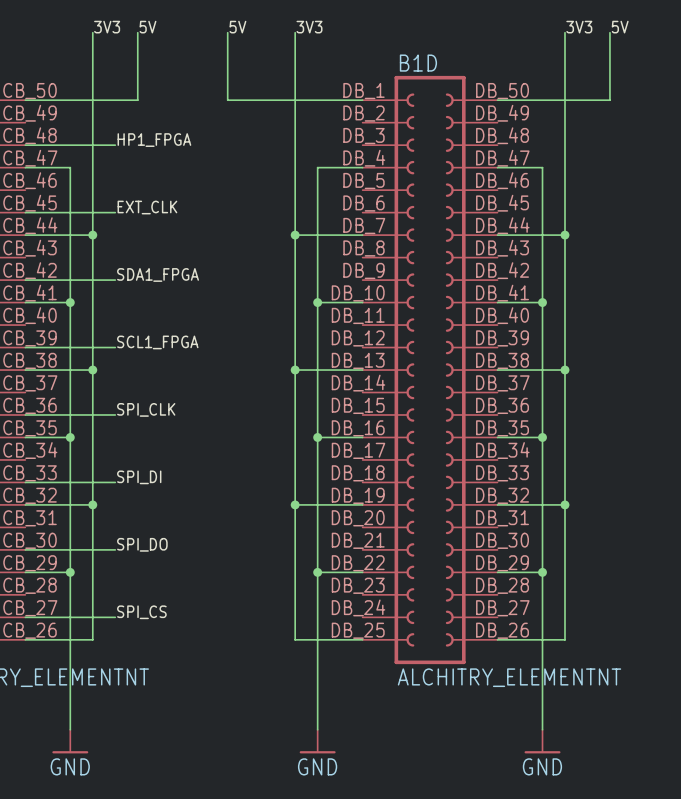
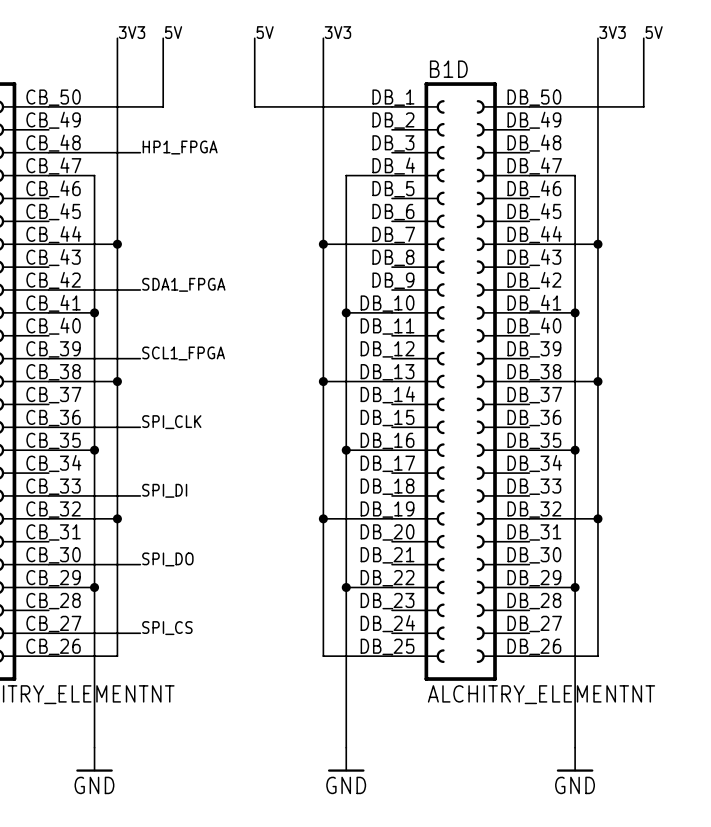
label: EXT_CLK (147, 207) -> none
wire: (25, 212) (115, 212) -> none

